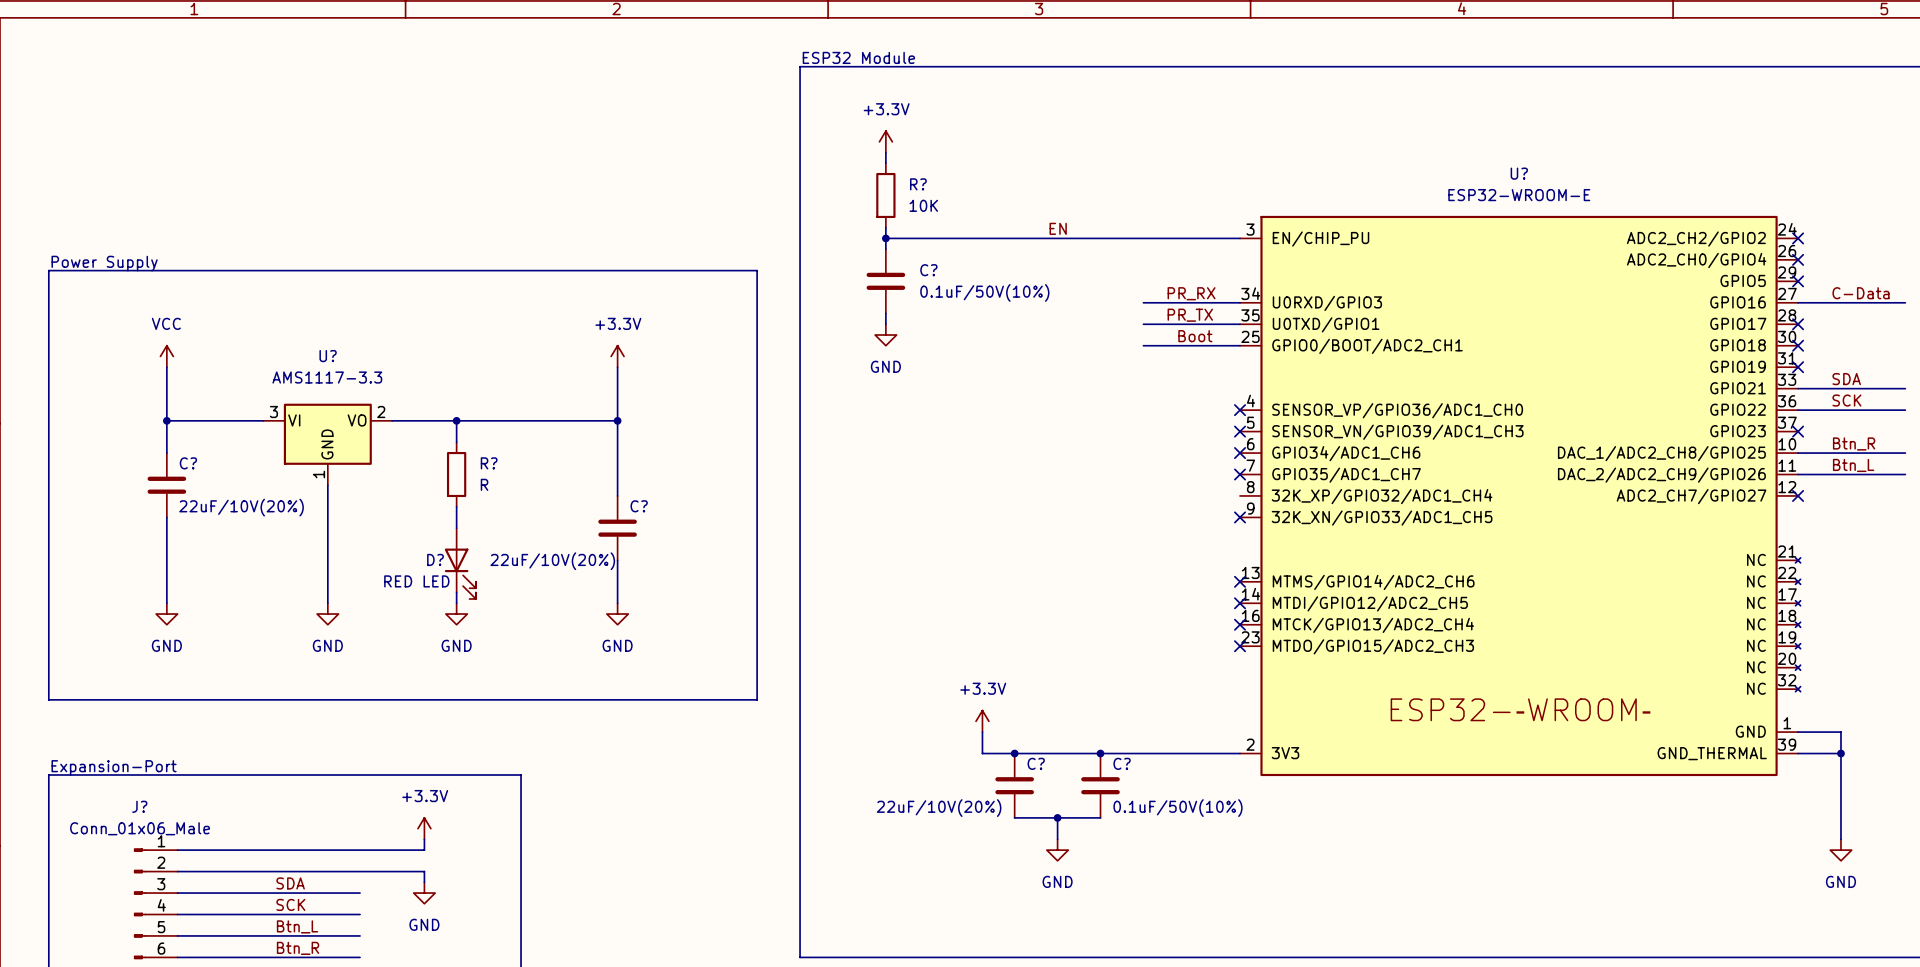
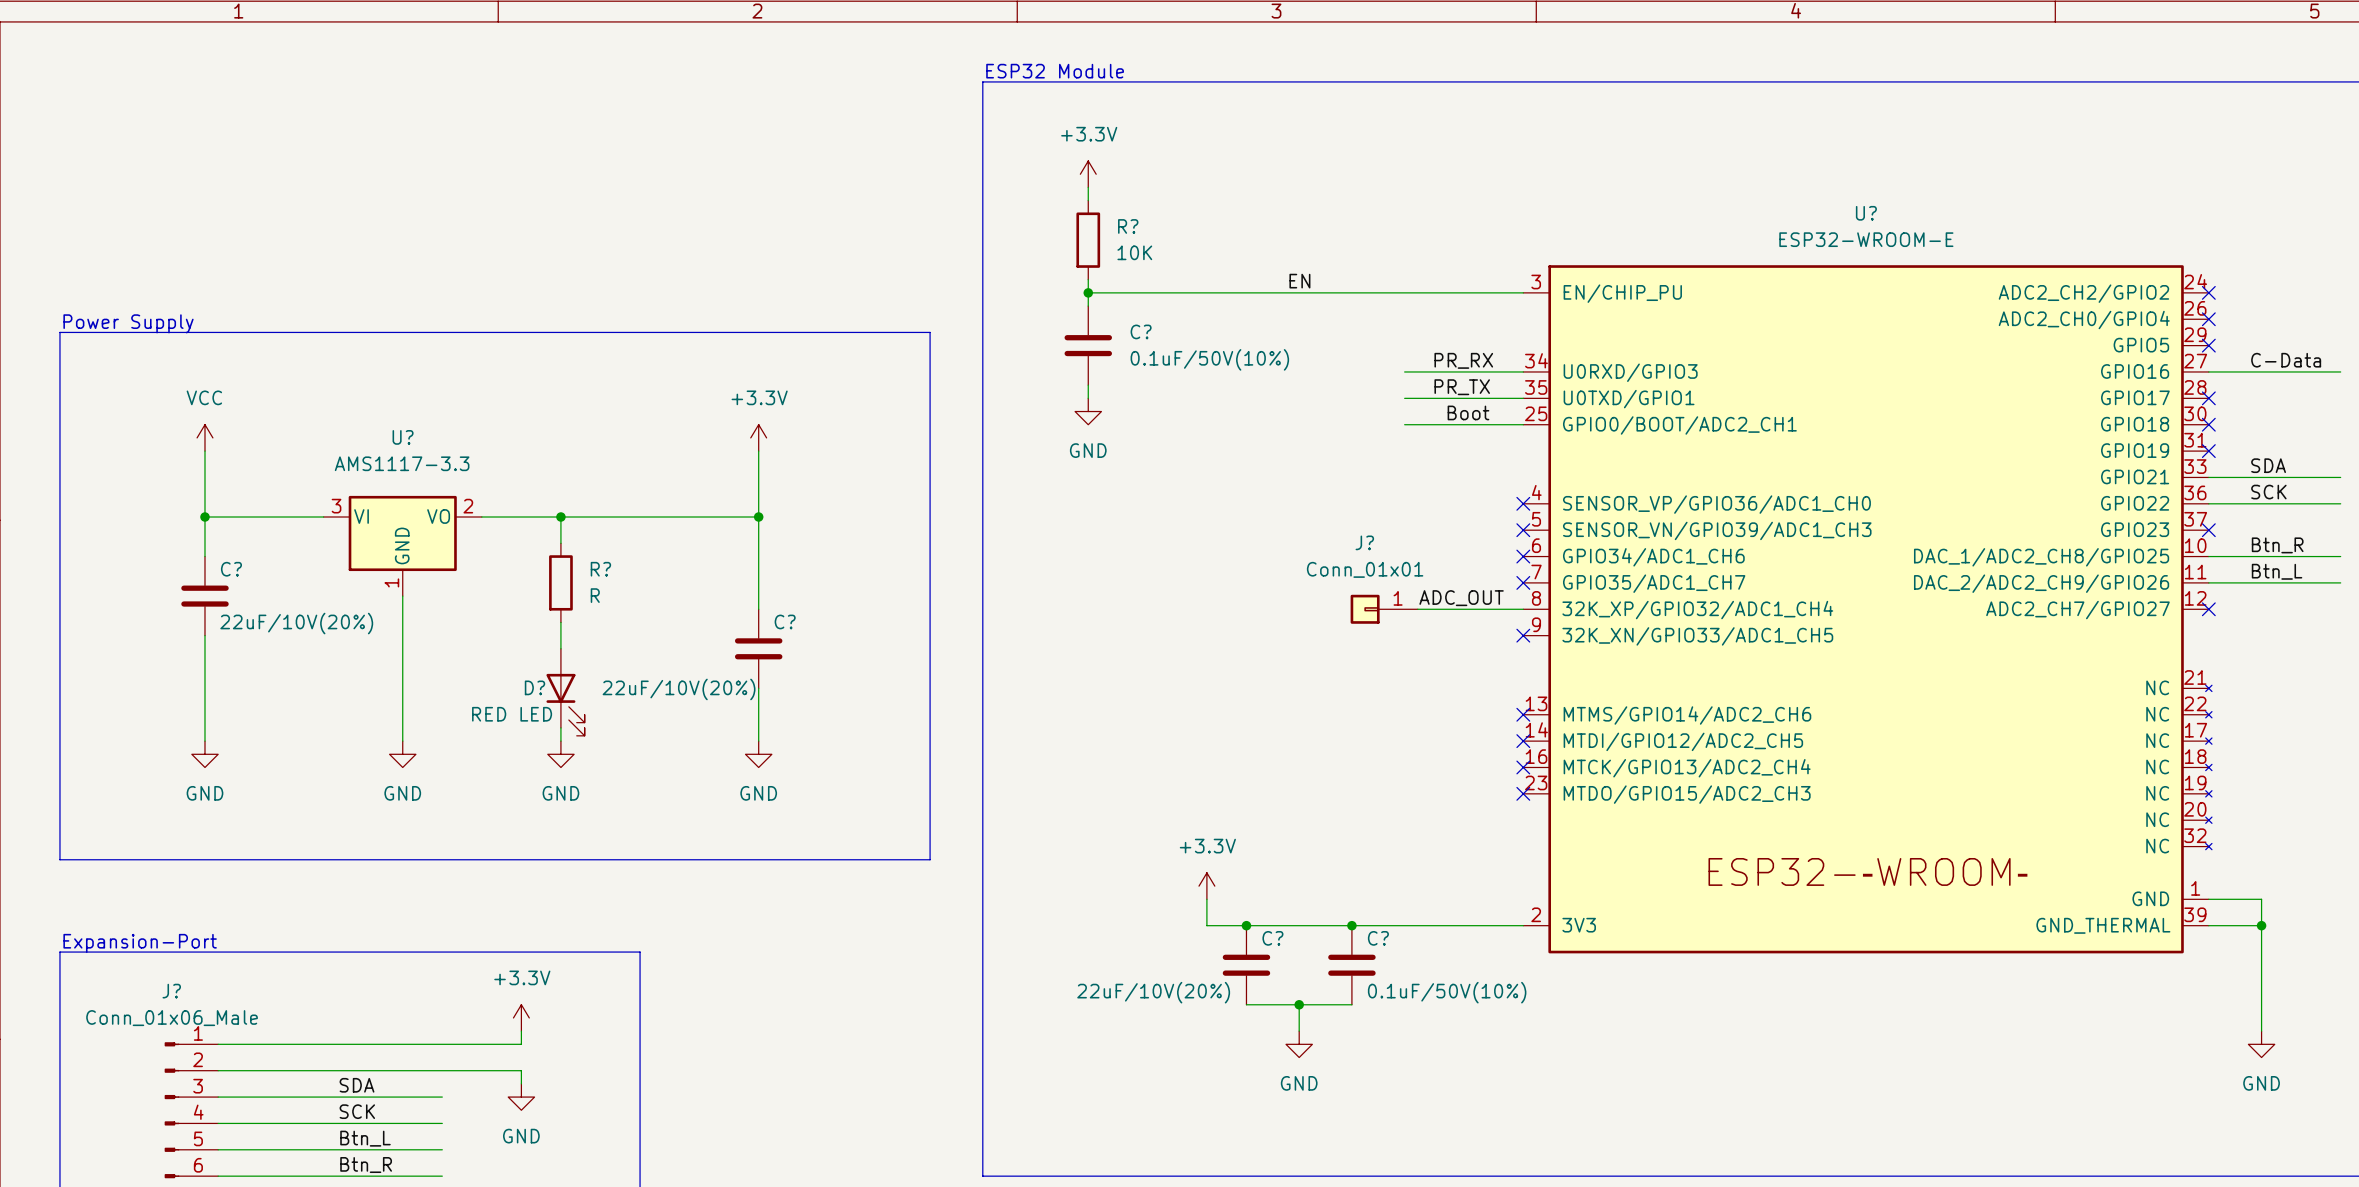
label: none -> ADC_OUT (1461, 598)
J?: none -> Conn_01x01 (1384, 609)
wire: none -> (1417, 609) (1523, 609)

